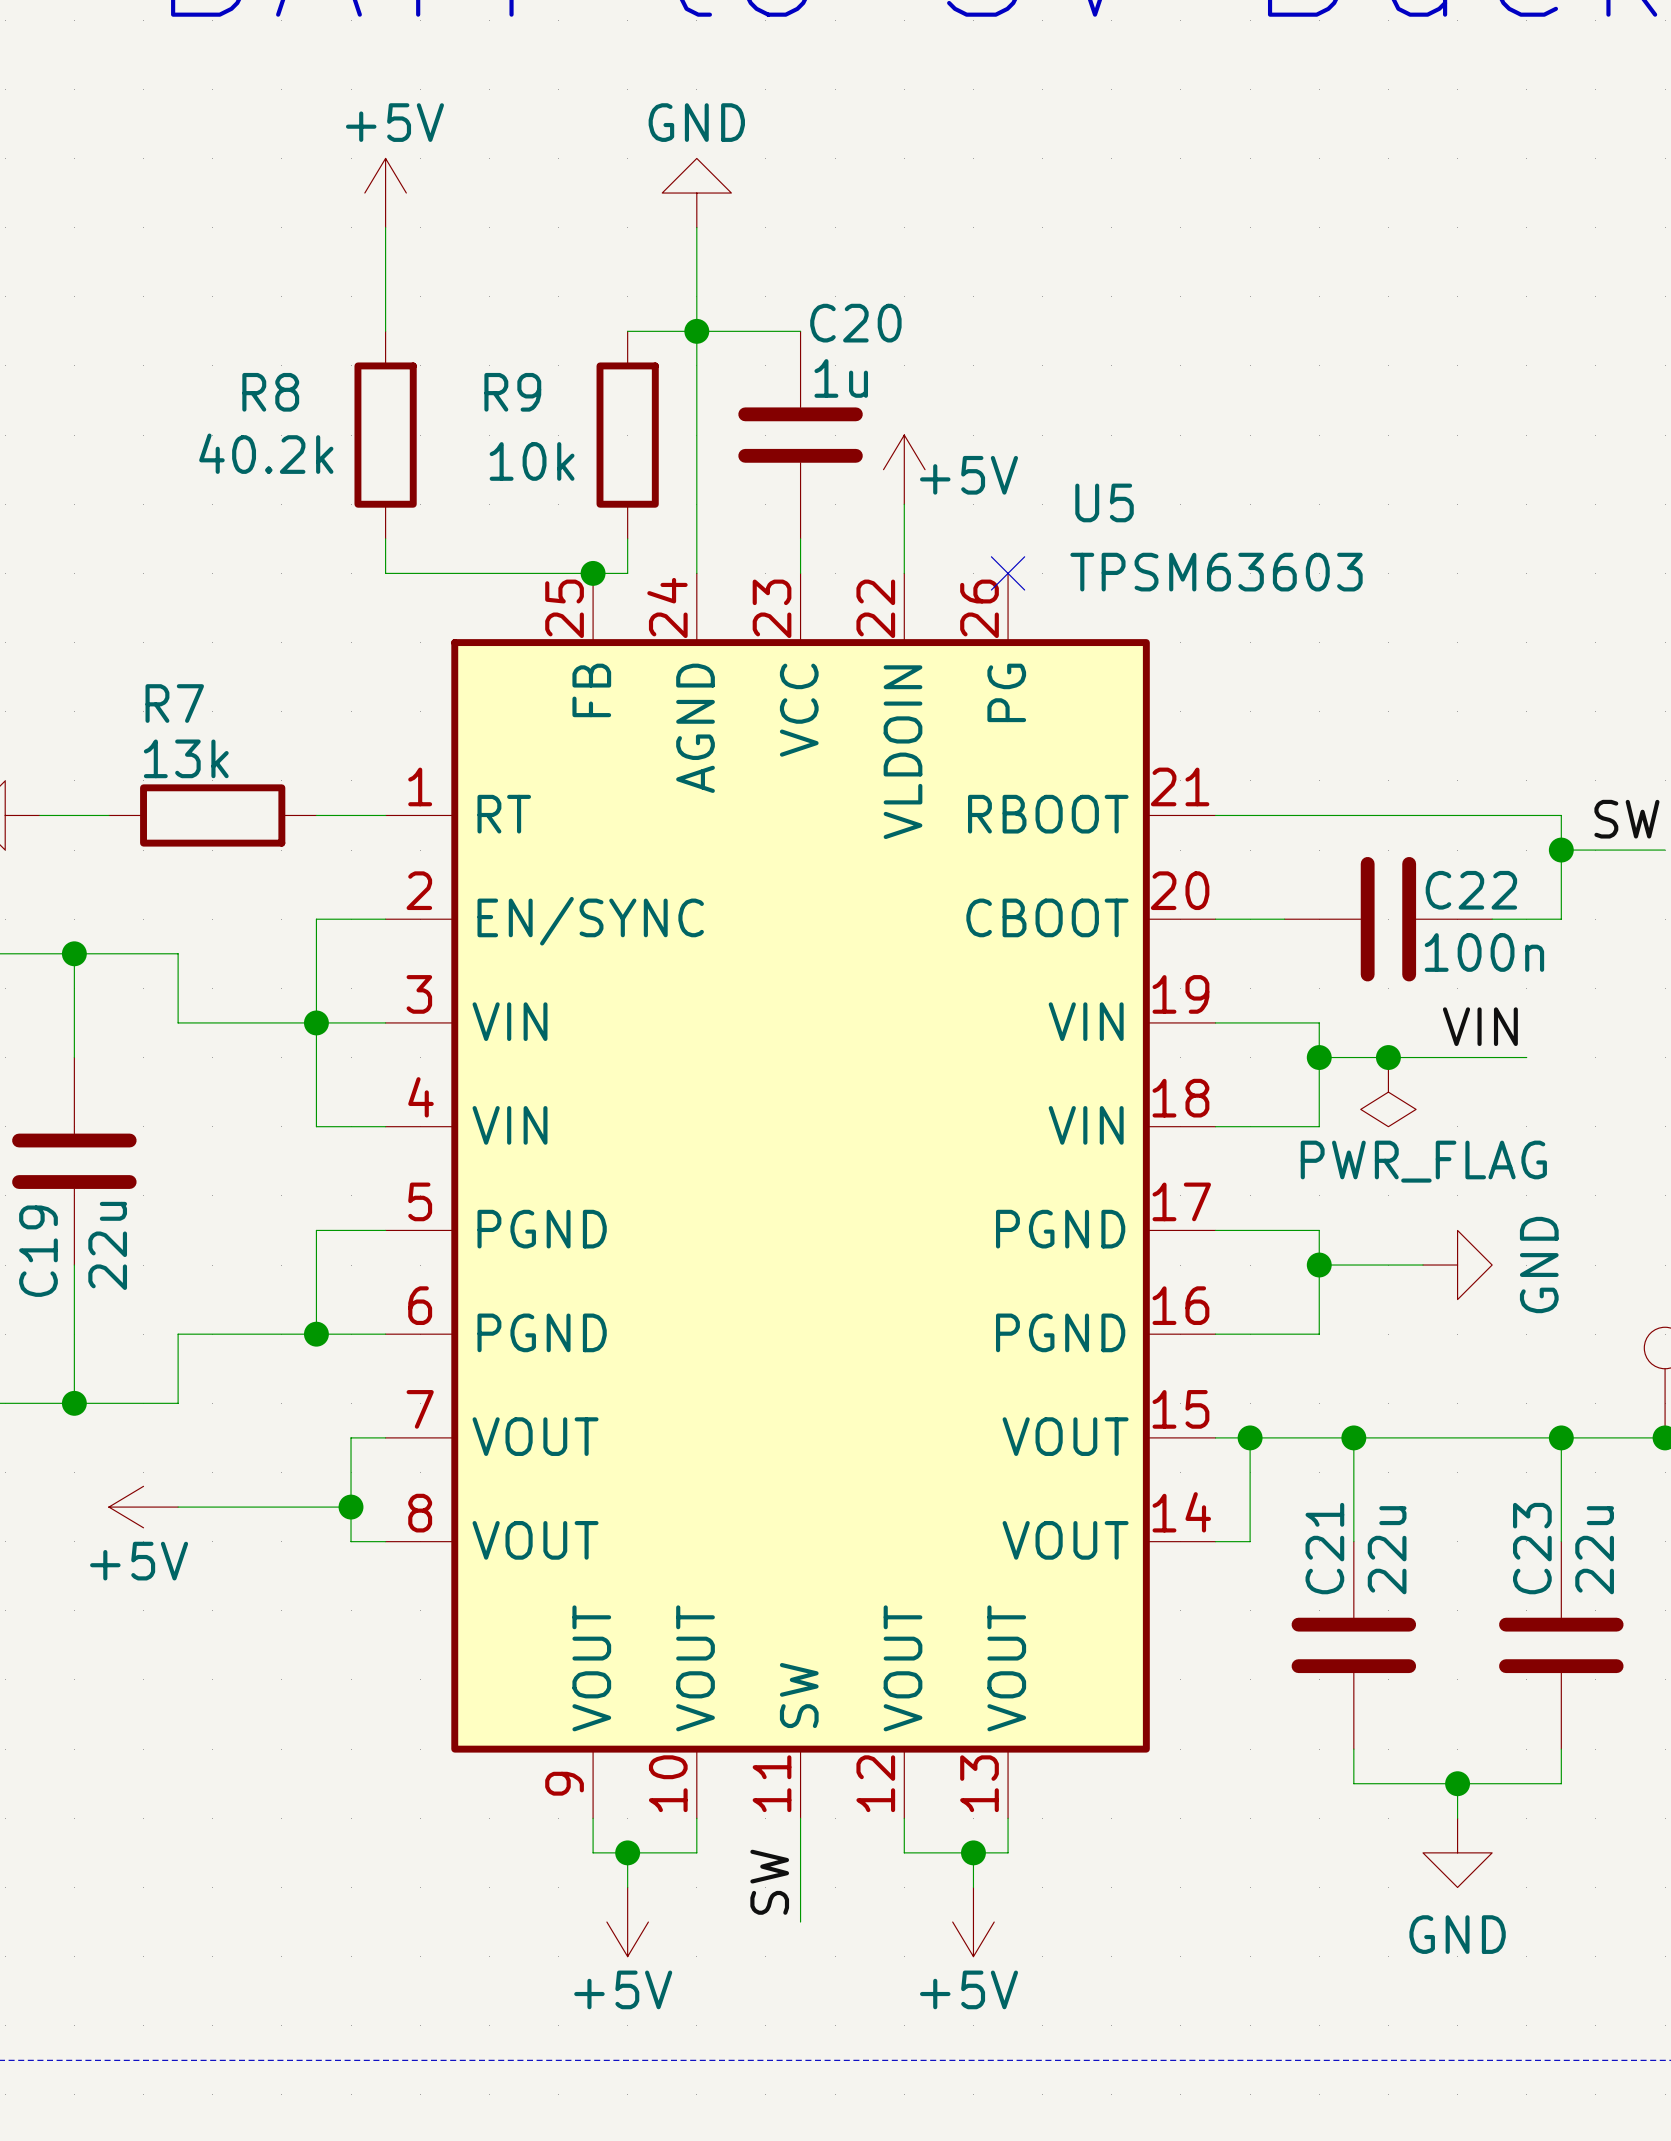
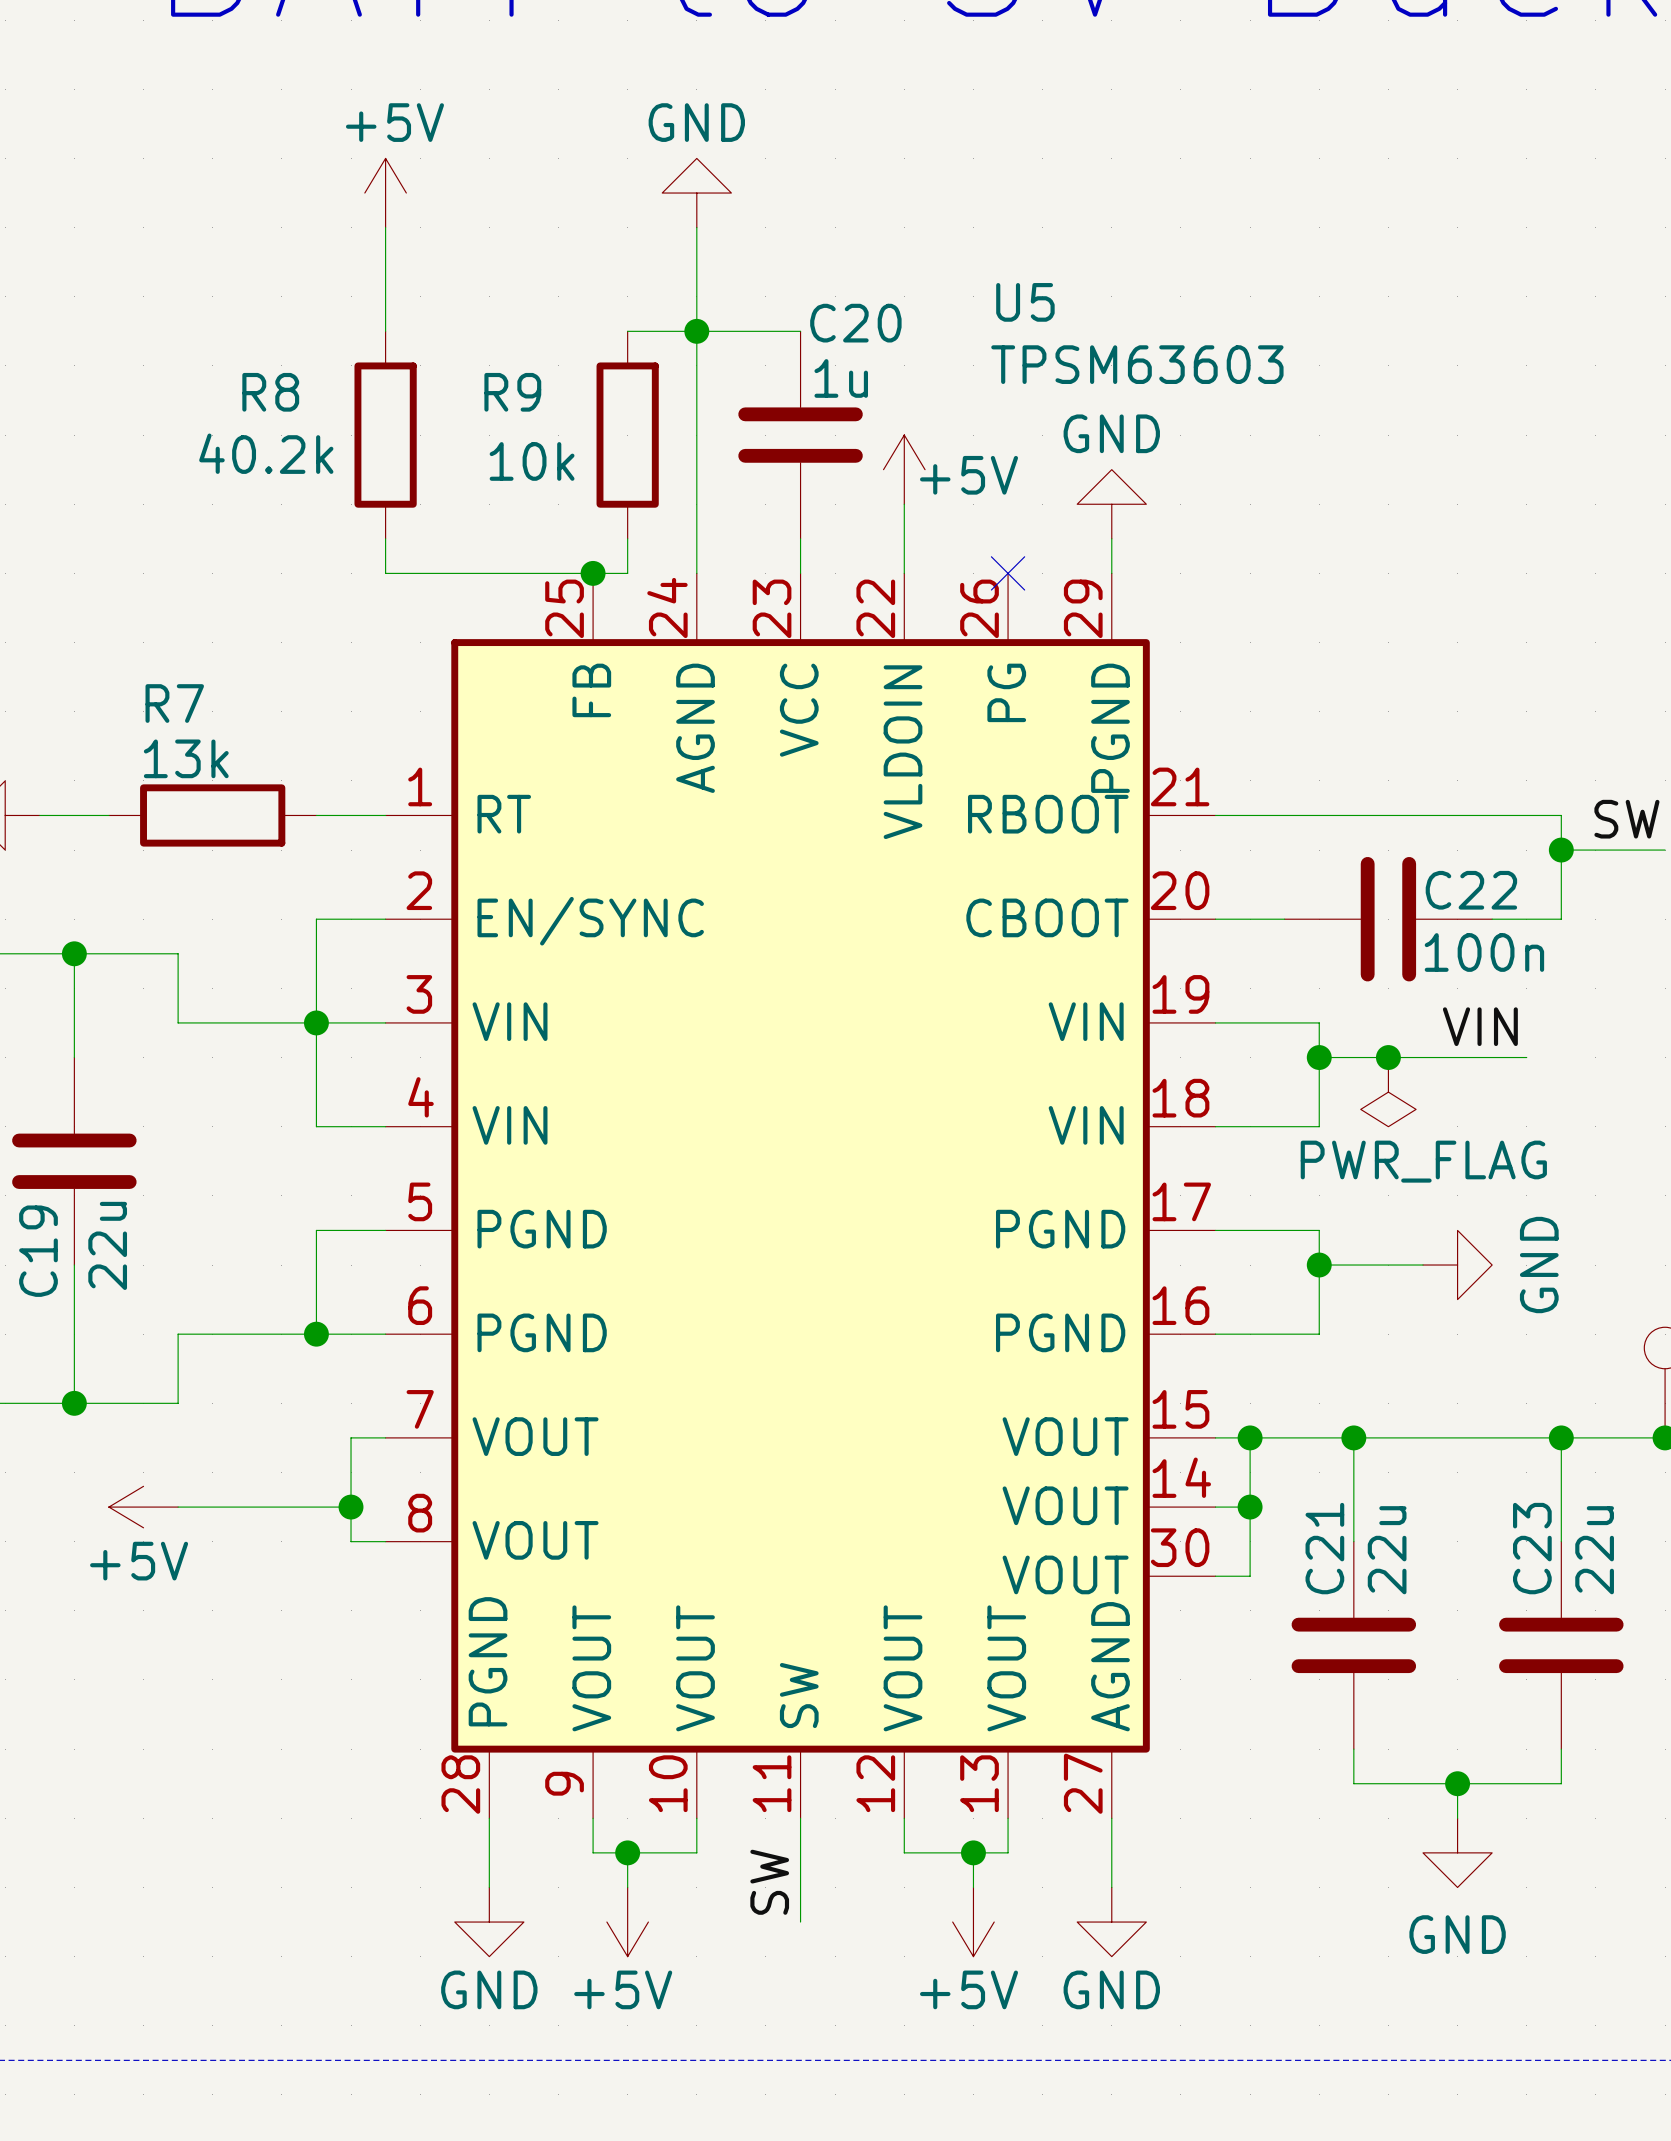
U5 name position: U5 (1104, 502) -> U5 (1025, 302)
power symbol: none -> GND (1111, 504)
wire: none -> (1111, 538) (1111, 573)
U5 value position: TPSM63603 (1216, 572) -> TPSM63603 (1137, 364)
U5 symbol: [385, 573, 1216, 1819] -> [385, 573, 1216, 1819]
wire: none -> (1215, 1507) (1250, 1507)
junction: none -> (1250, 1507)
wire: (1215, 1541) (1250, 1541) -> (1215, 1576) (1250, 1576) (1250, 1541)
wire: none -> (489, 1818) (489, 1887)
wire: none -> (1111, 1818) (1111, 1887)
power symbol: none -> GND (489, 1922)
power symbol: none -> GND (1111, 1922)

